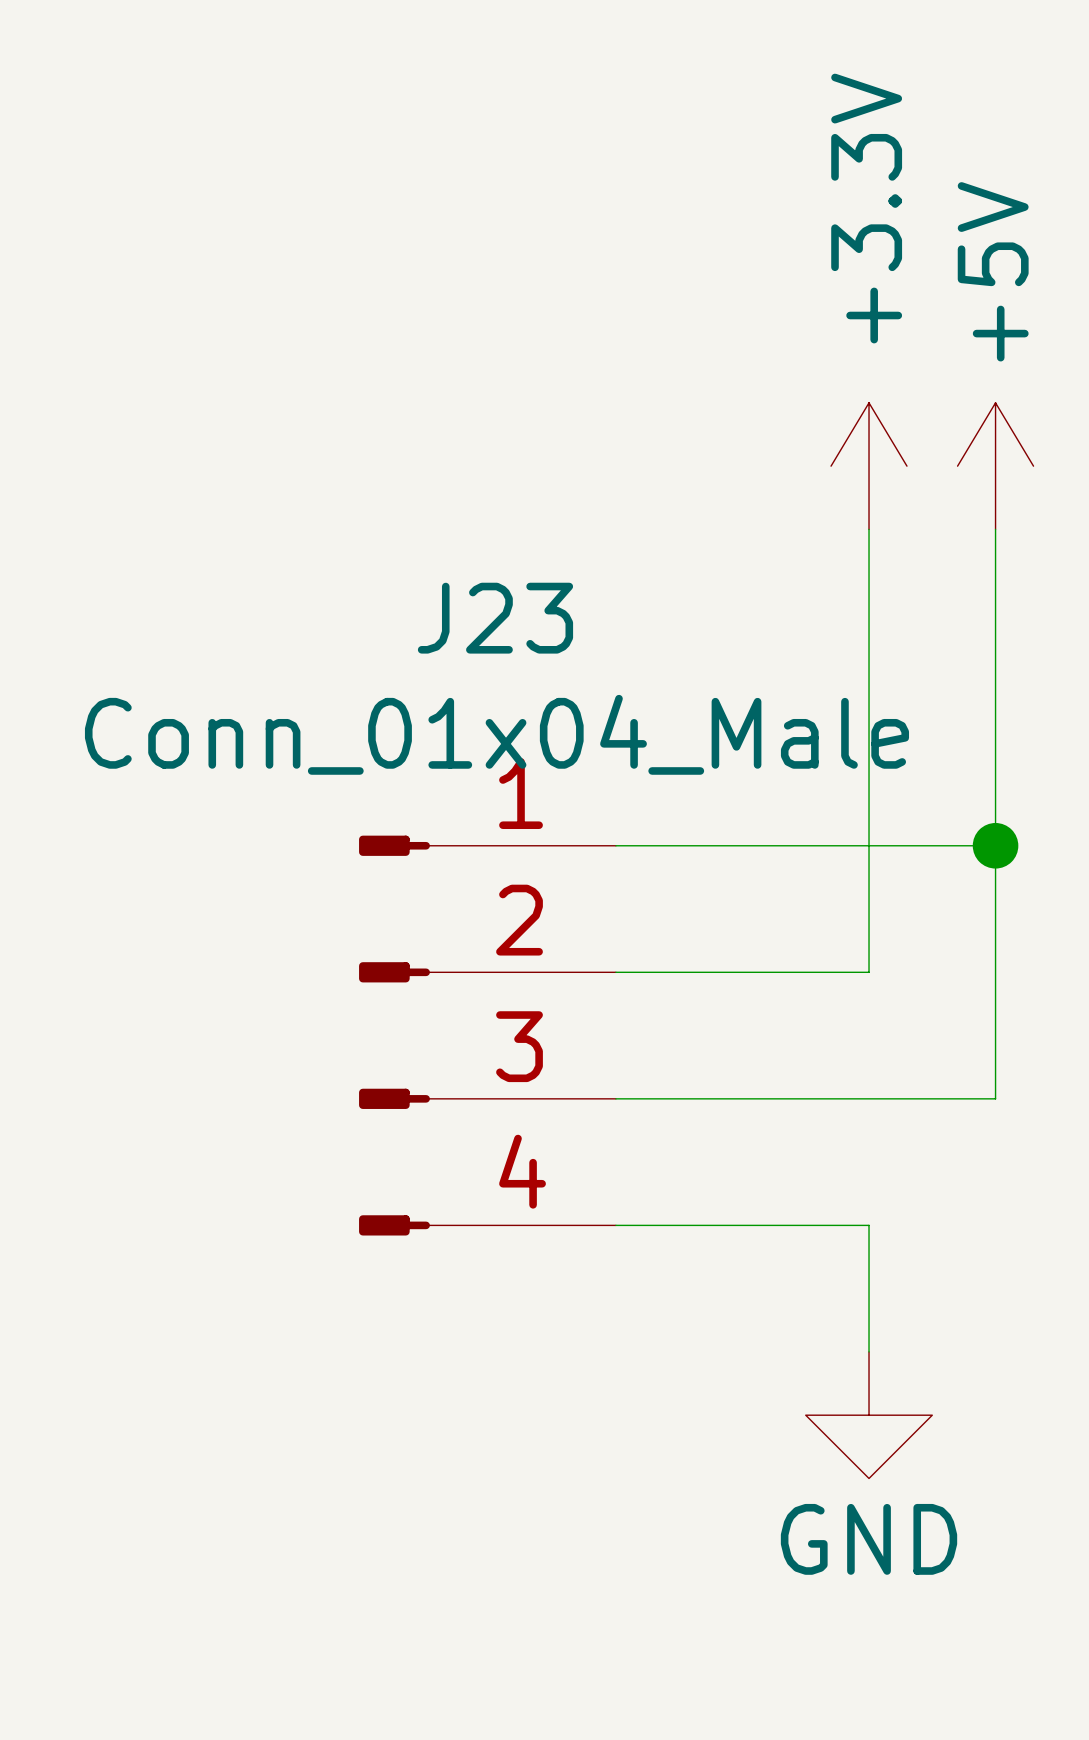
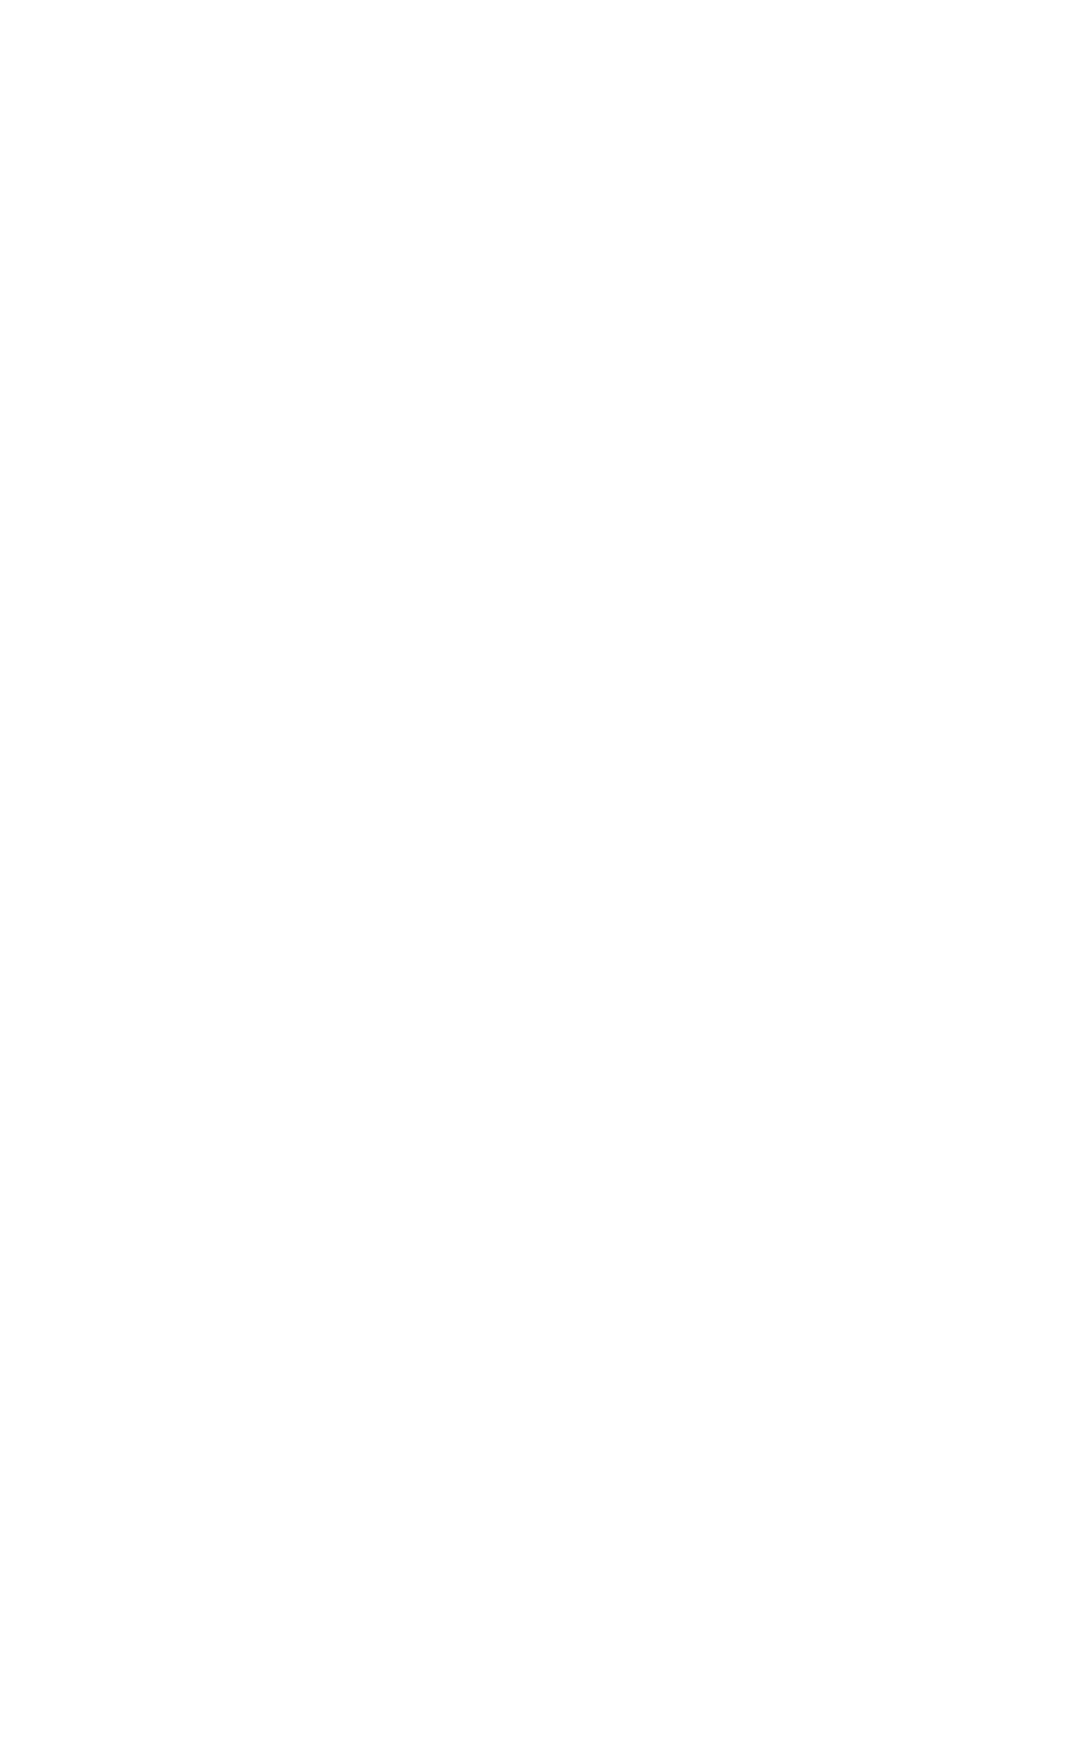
power symbol: +3.3V (869, 466) -> none
power symbol: +5V (995, 466) -> none
wire: (869, 529) (869, 972) (615, 972) -> none
wire: (995, 529) (995, 1098) (615, 1098) -> none
wire: (615, 845) (995, 845) -> none
junction: (995, 845) -> none
J23: Conn_01x04_Male (487, 1035) -> none
wire: (615, 1225) (869, 1225) (869, 1351) -> none
power symbol: GND (869, 1415) -> none

